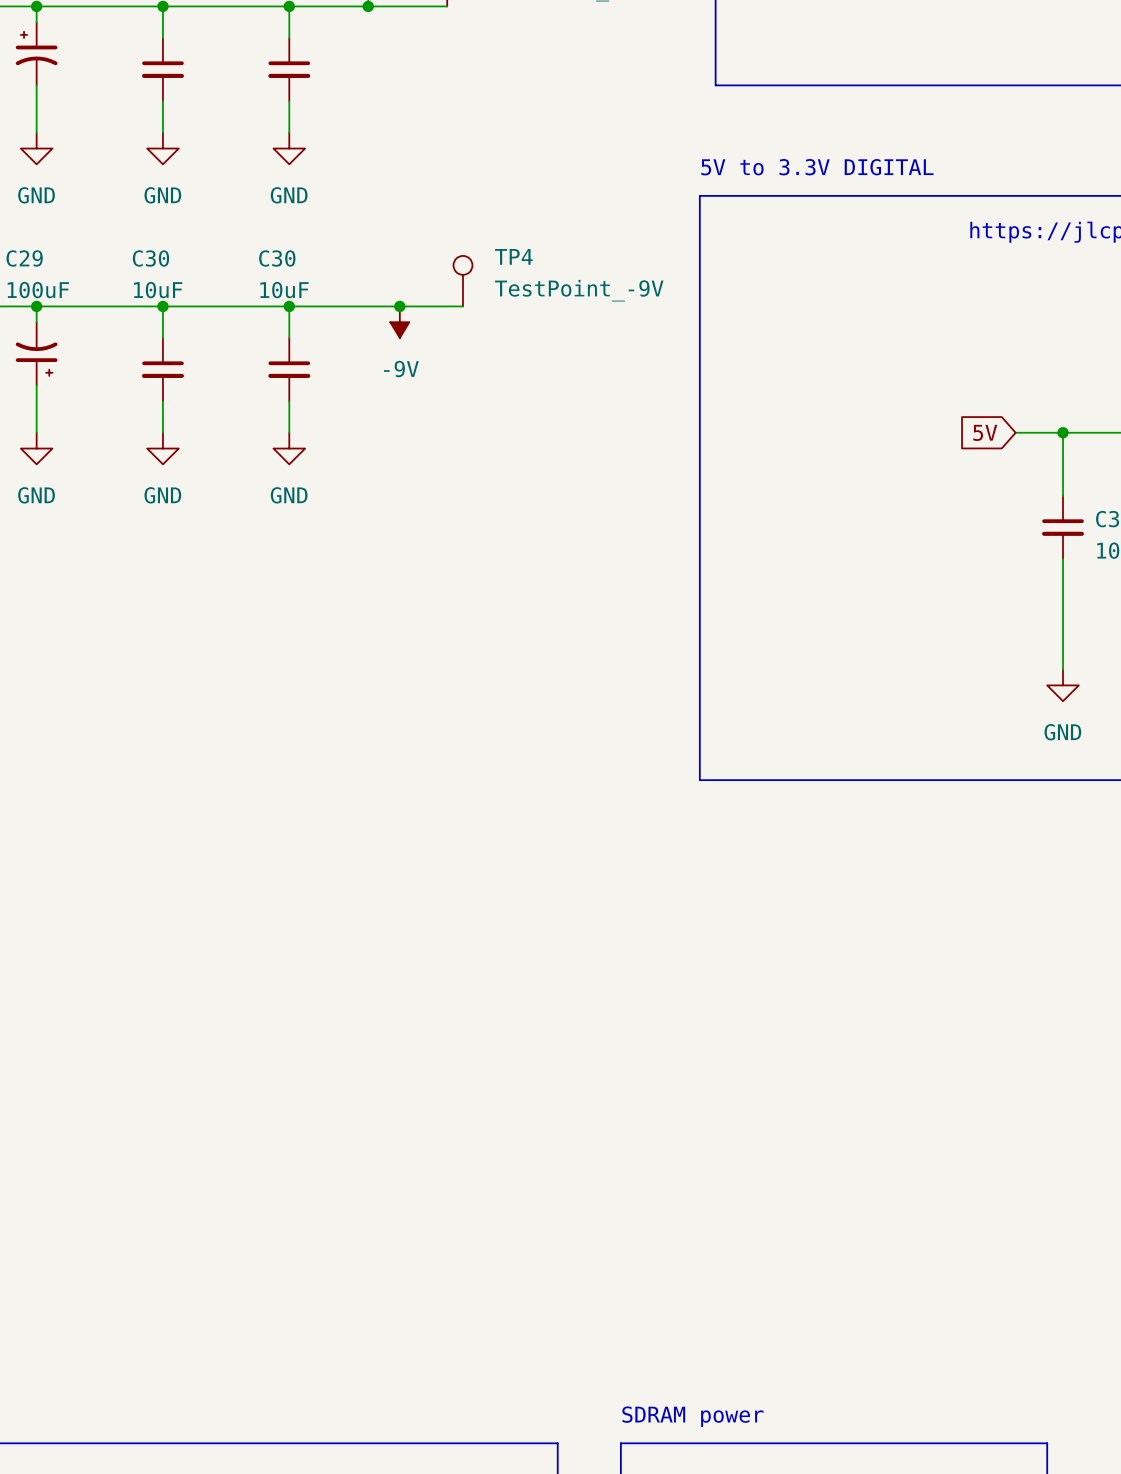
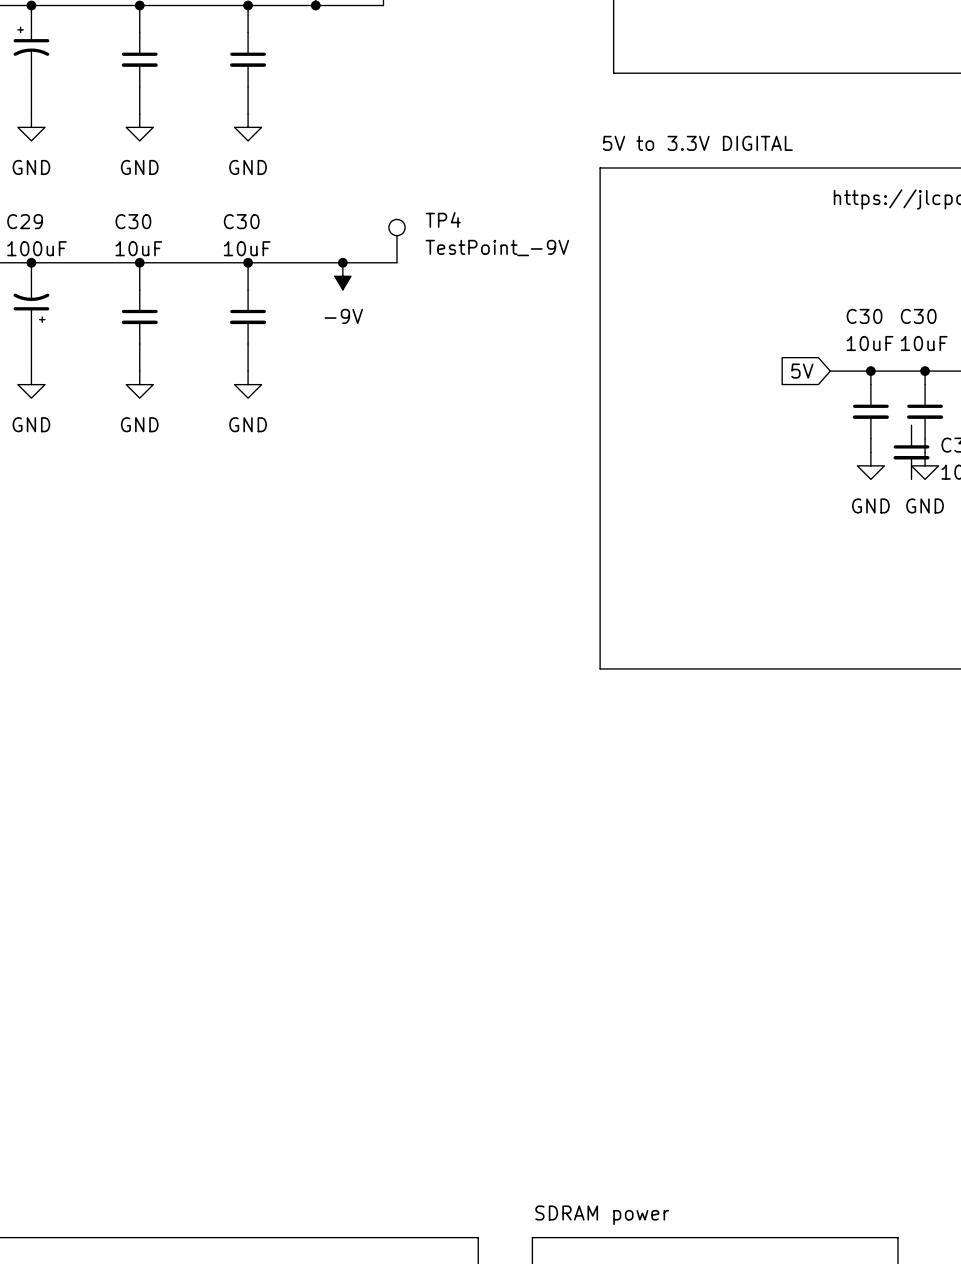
wire: none -> (830, 371) (870, 371) (870, 384)
global label position: 5V (985, 432) -> 5V (802, 371)
junction: none -> (870, 371)
wire: (1063, 432) (1063, 495) -> none
junction position: (1063, 432) -> (925, 371)
wire: none -> (925, 371) (925, 384)
C30: none -> 10uF (870, 411)
C30: none -> 10uF (925, 411)
wire: none -> (870, 438) (870, 452)
wire: none -> (925, 438) (925, 452)
power symbol: none -> GND (870, 465)
power symbol: none -> GND (925, 465)
wire: (1063, 559) (1063, 669) -> none
power symbol: GND (1063, 685) -> none

